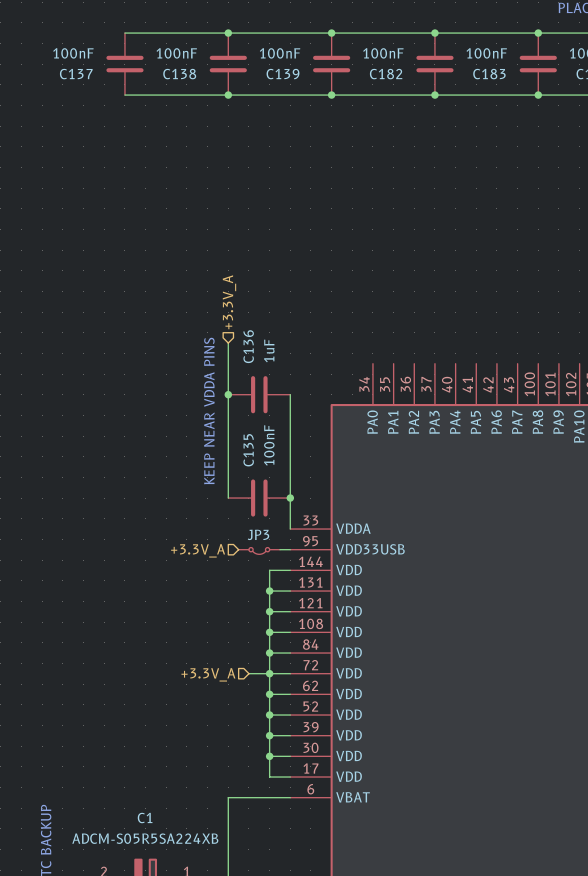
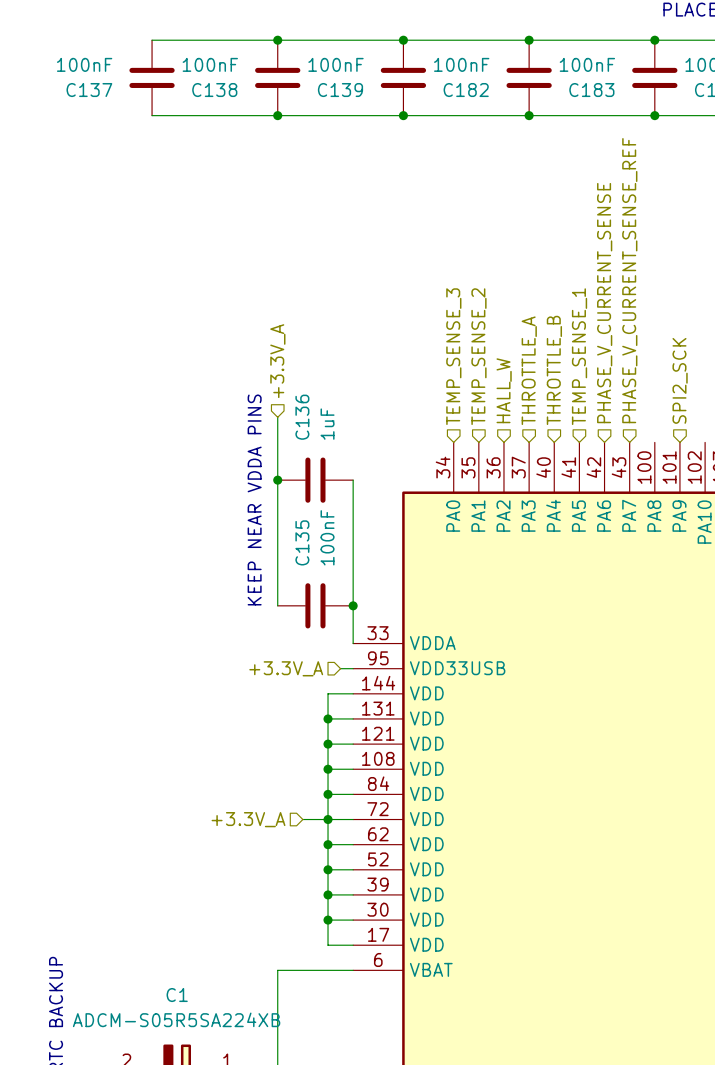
hierarchical label: none -> PHASE_V_CURRENT_SENSE_REF (629, 280)
hierarchical label: none -> PHASE_V_CURRENT_SENSE (604, 303)
hierarchical label: none -> TEMP_SENSE_3 (453, 356)
hierarchical label: none -> TEMP_SENSE_2 (478, 356)
hierarchical label: none -> TEMP_SENSE_1 (579, 356)
hierarchical label: none -> THROTTLE_A (529, 370)
hierarchical label: none -> THROTTLE_B (554, 370)
hierarchical label: none -> SPI2_SCK (680, 380)
hierarchical label: none -> HALL_W (504, 390)
hierarchical label position: +3.3V_A (198, 550) -> +3.3V_A (286, 668)
JP3: (259, 550) -> none

